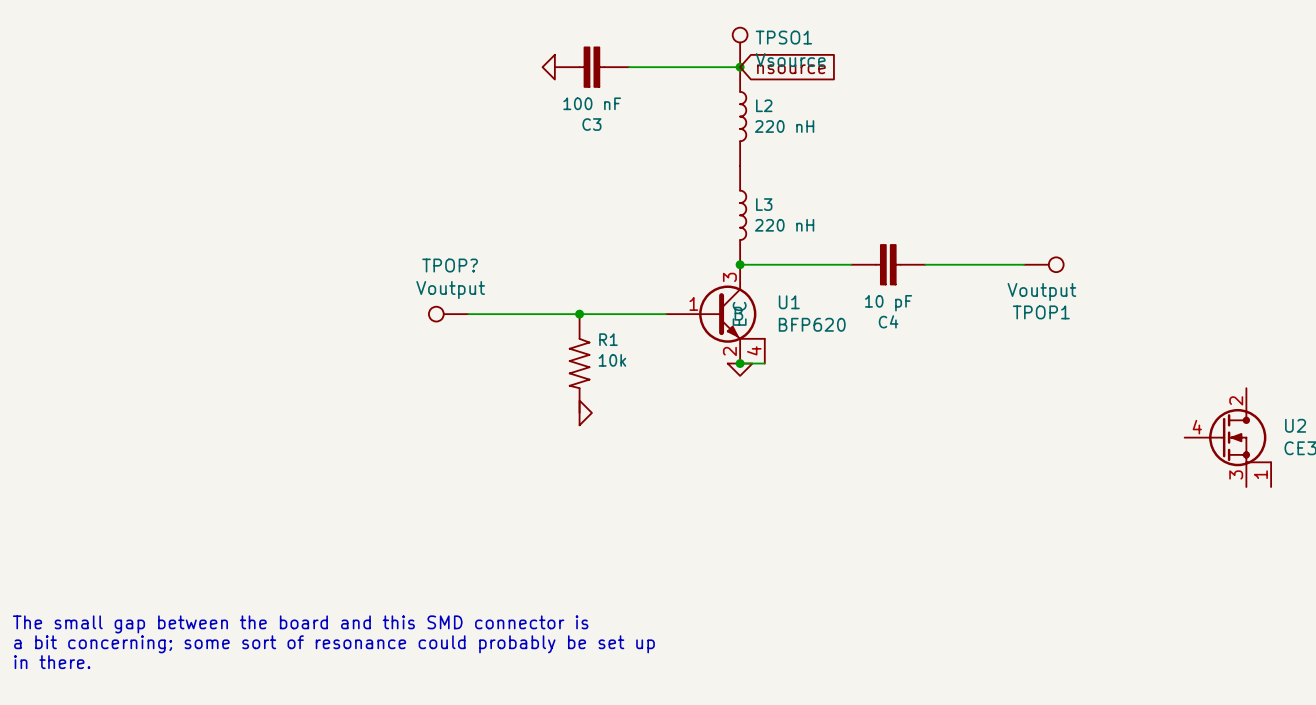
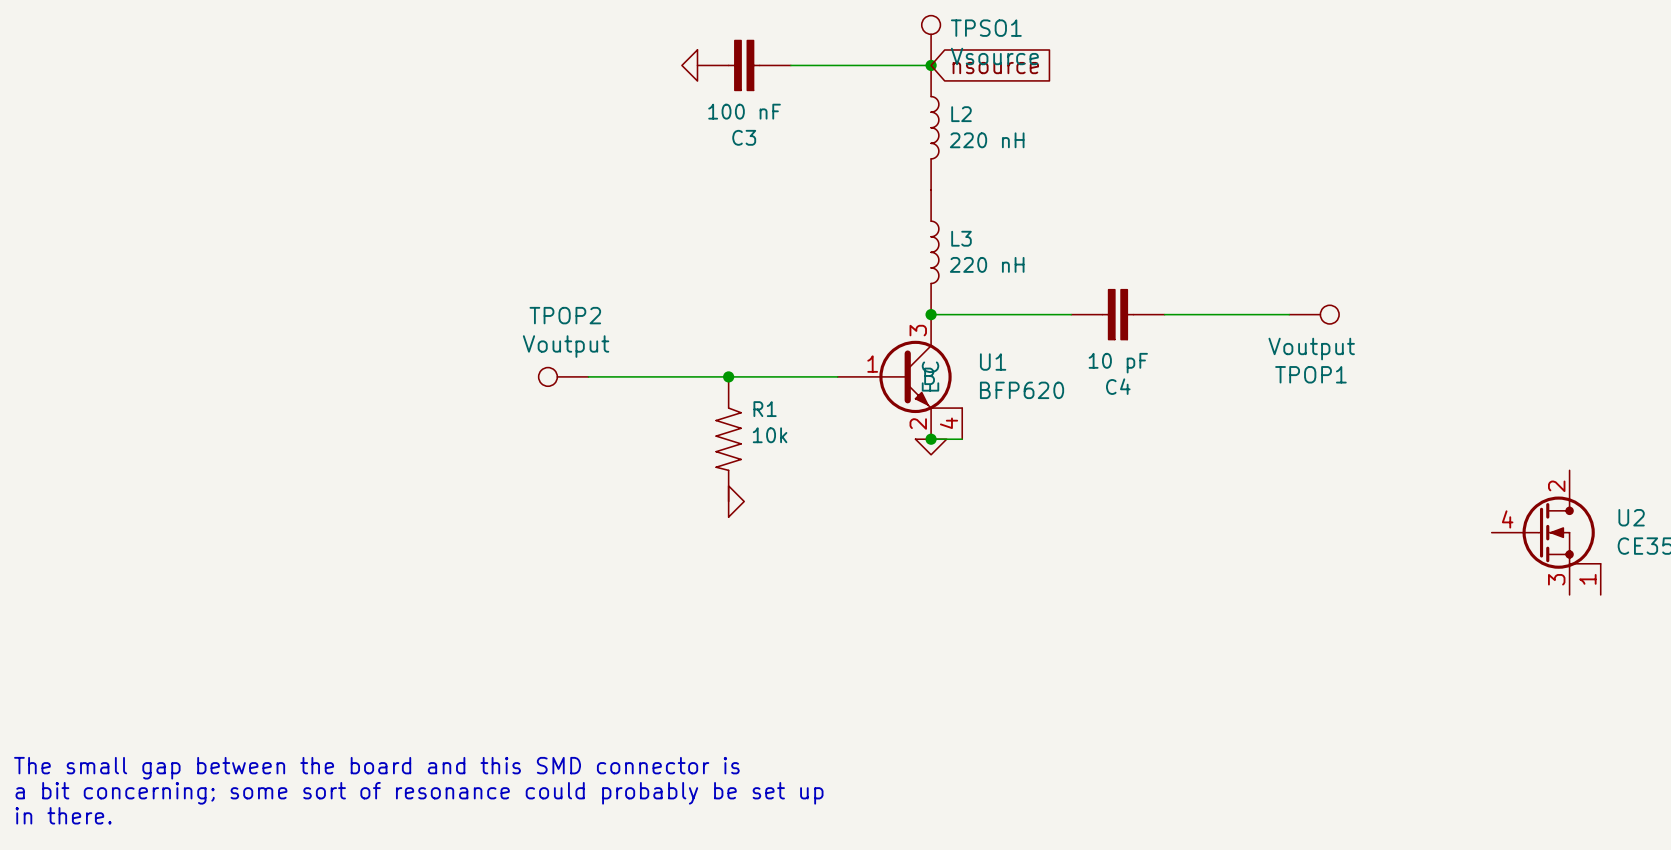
TPOP? name: TPOP? (450, 265) -> TPOP2 (565, 315)

